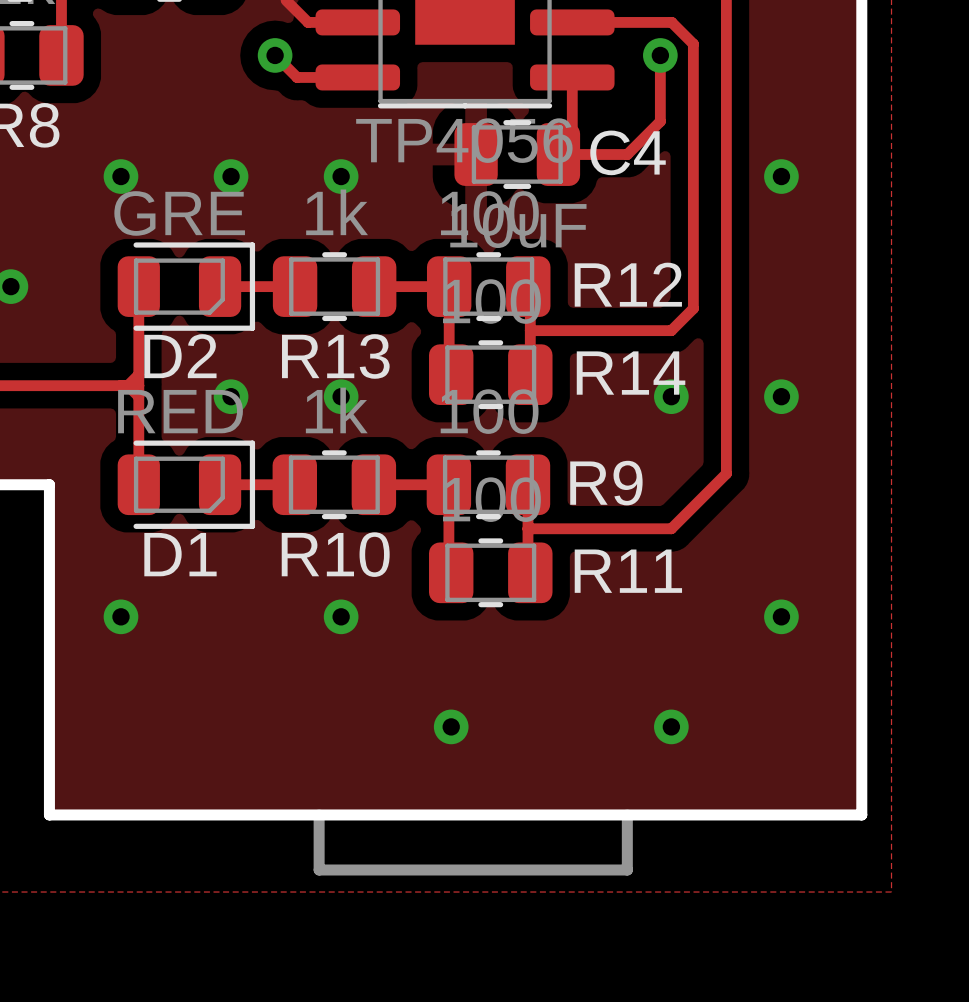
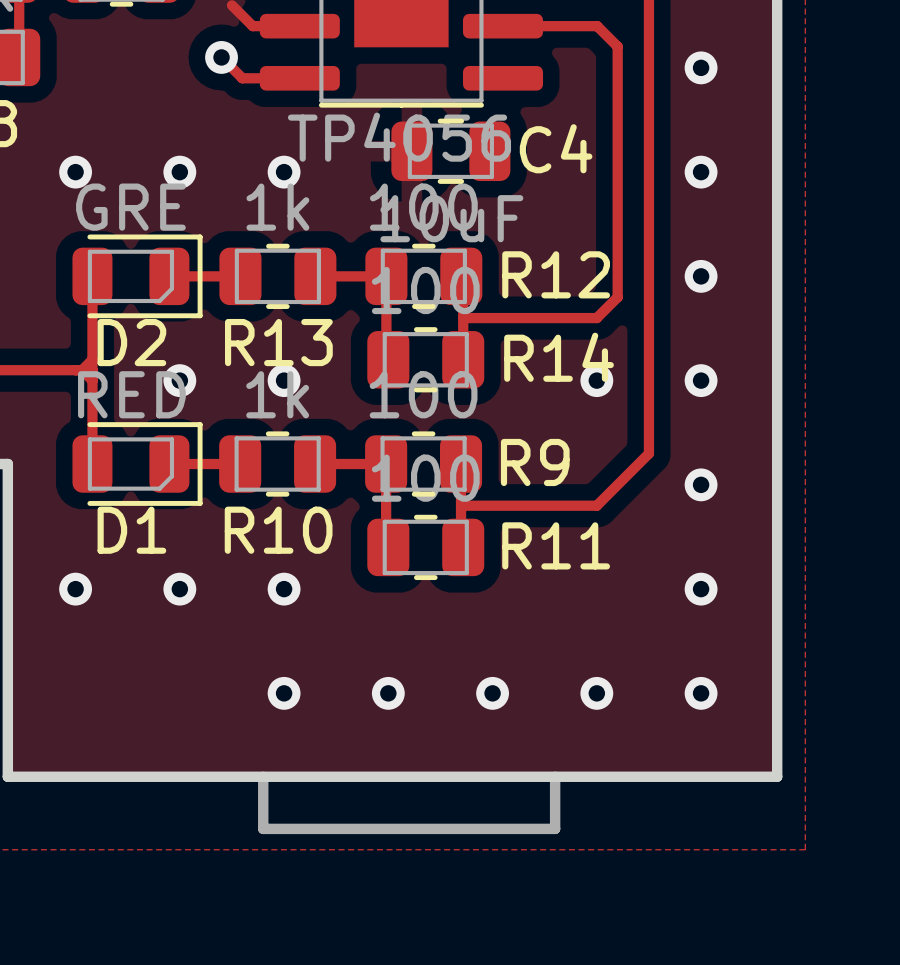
track: (660, 55) (660, 121) (627, 154) (558, 154) -> none
via: (660, 55) -> none
via: none -> (701, 67)
track: (572, 77) (572, 154) -> none
via: none -> (701, 276)
via: none -> (701, 484)
via: none -> (179, 589)
via: none -> (284, 693)
via: none -> (492, 693)
via: none -> (701, 693)

